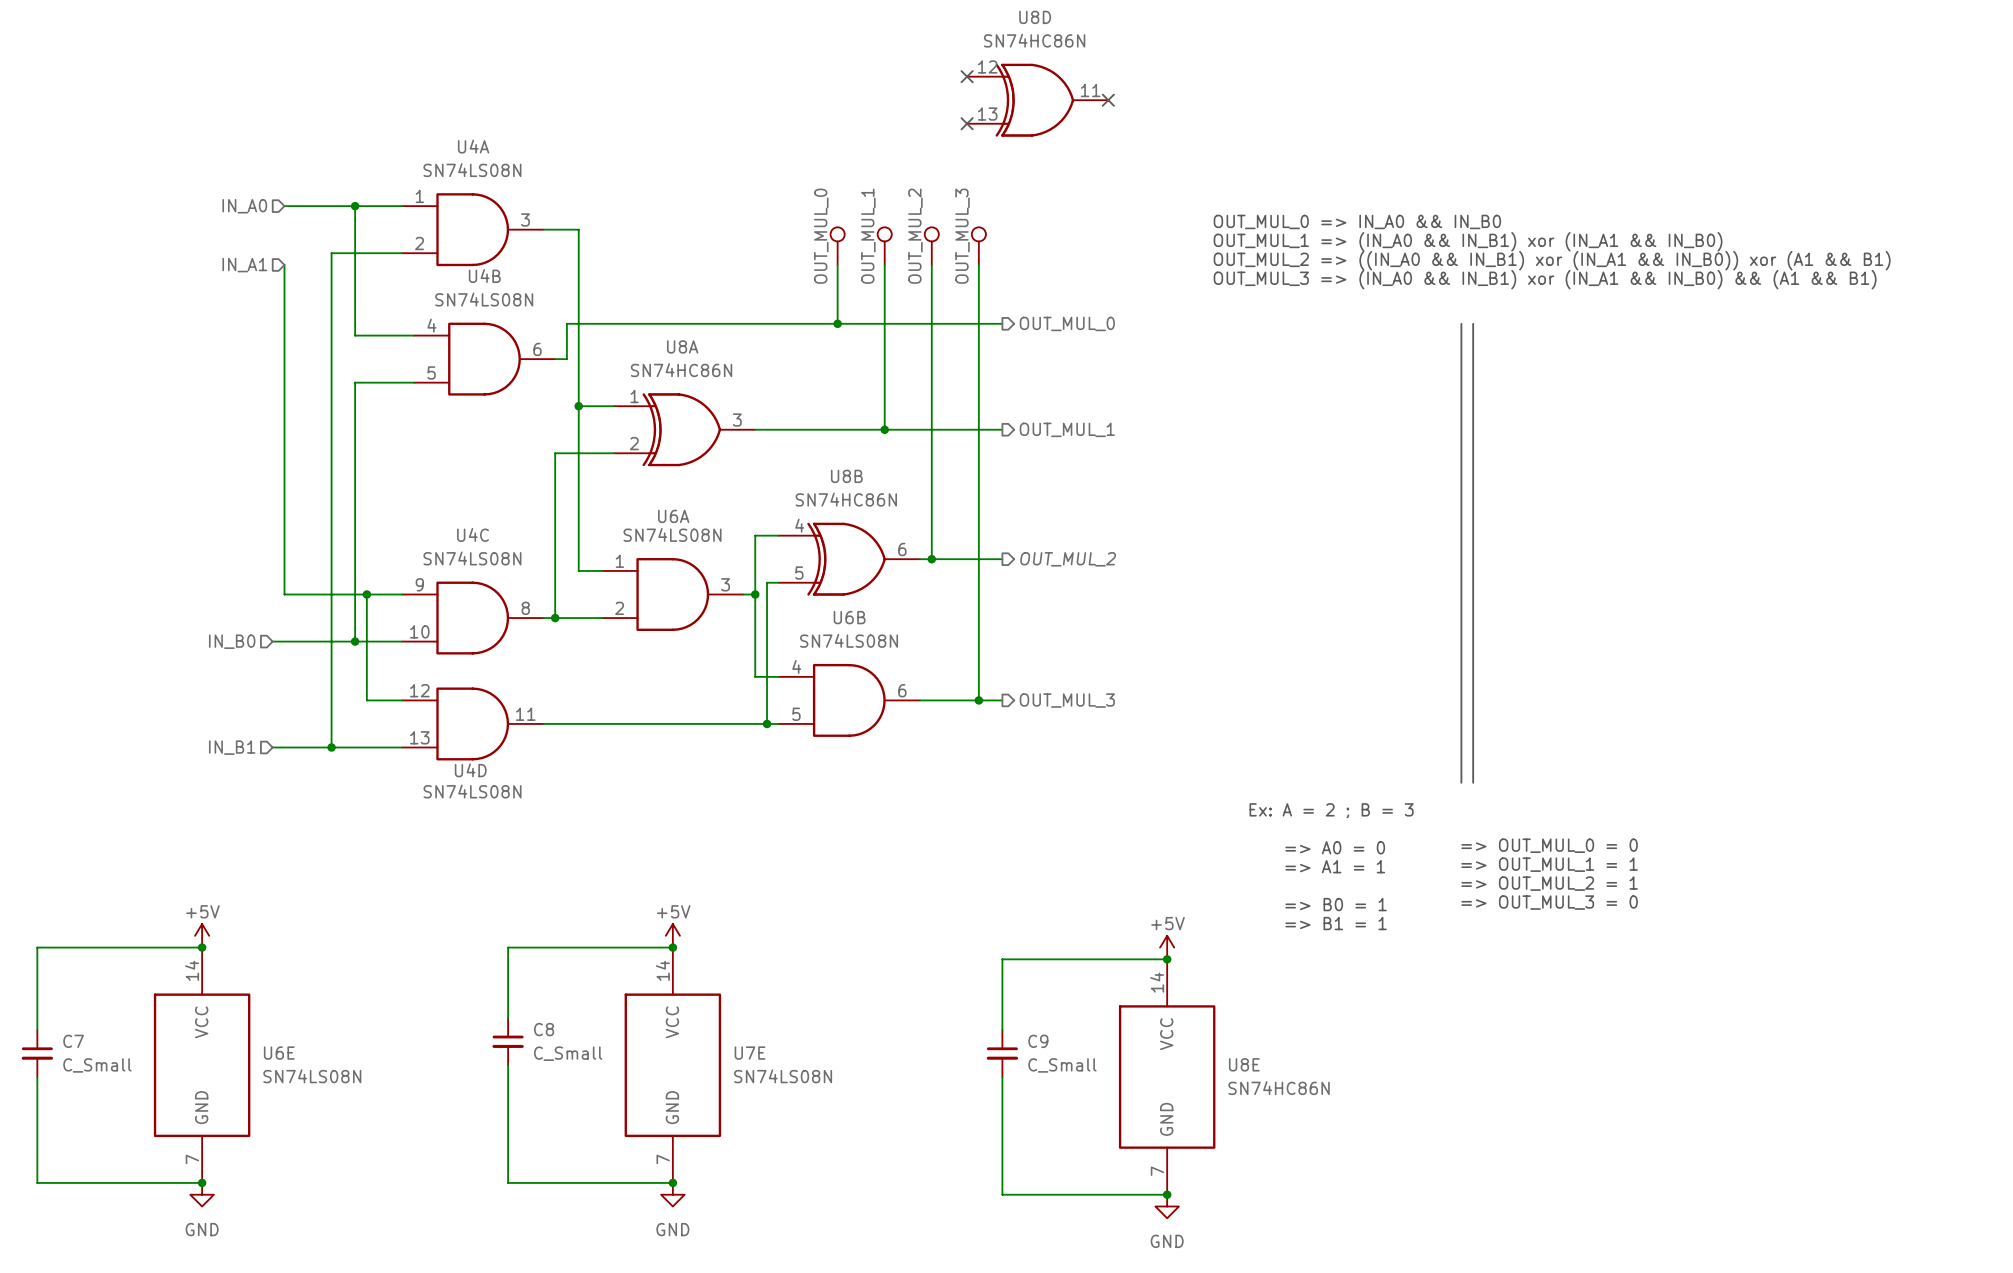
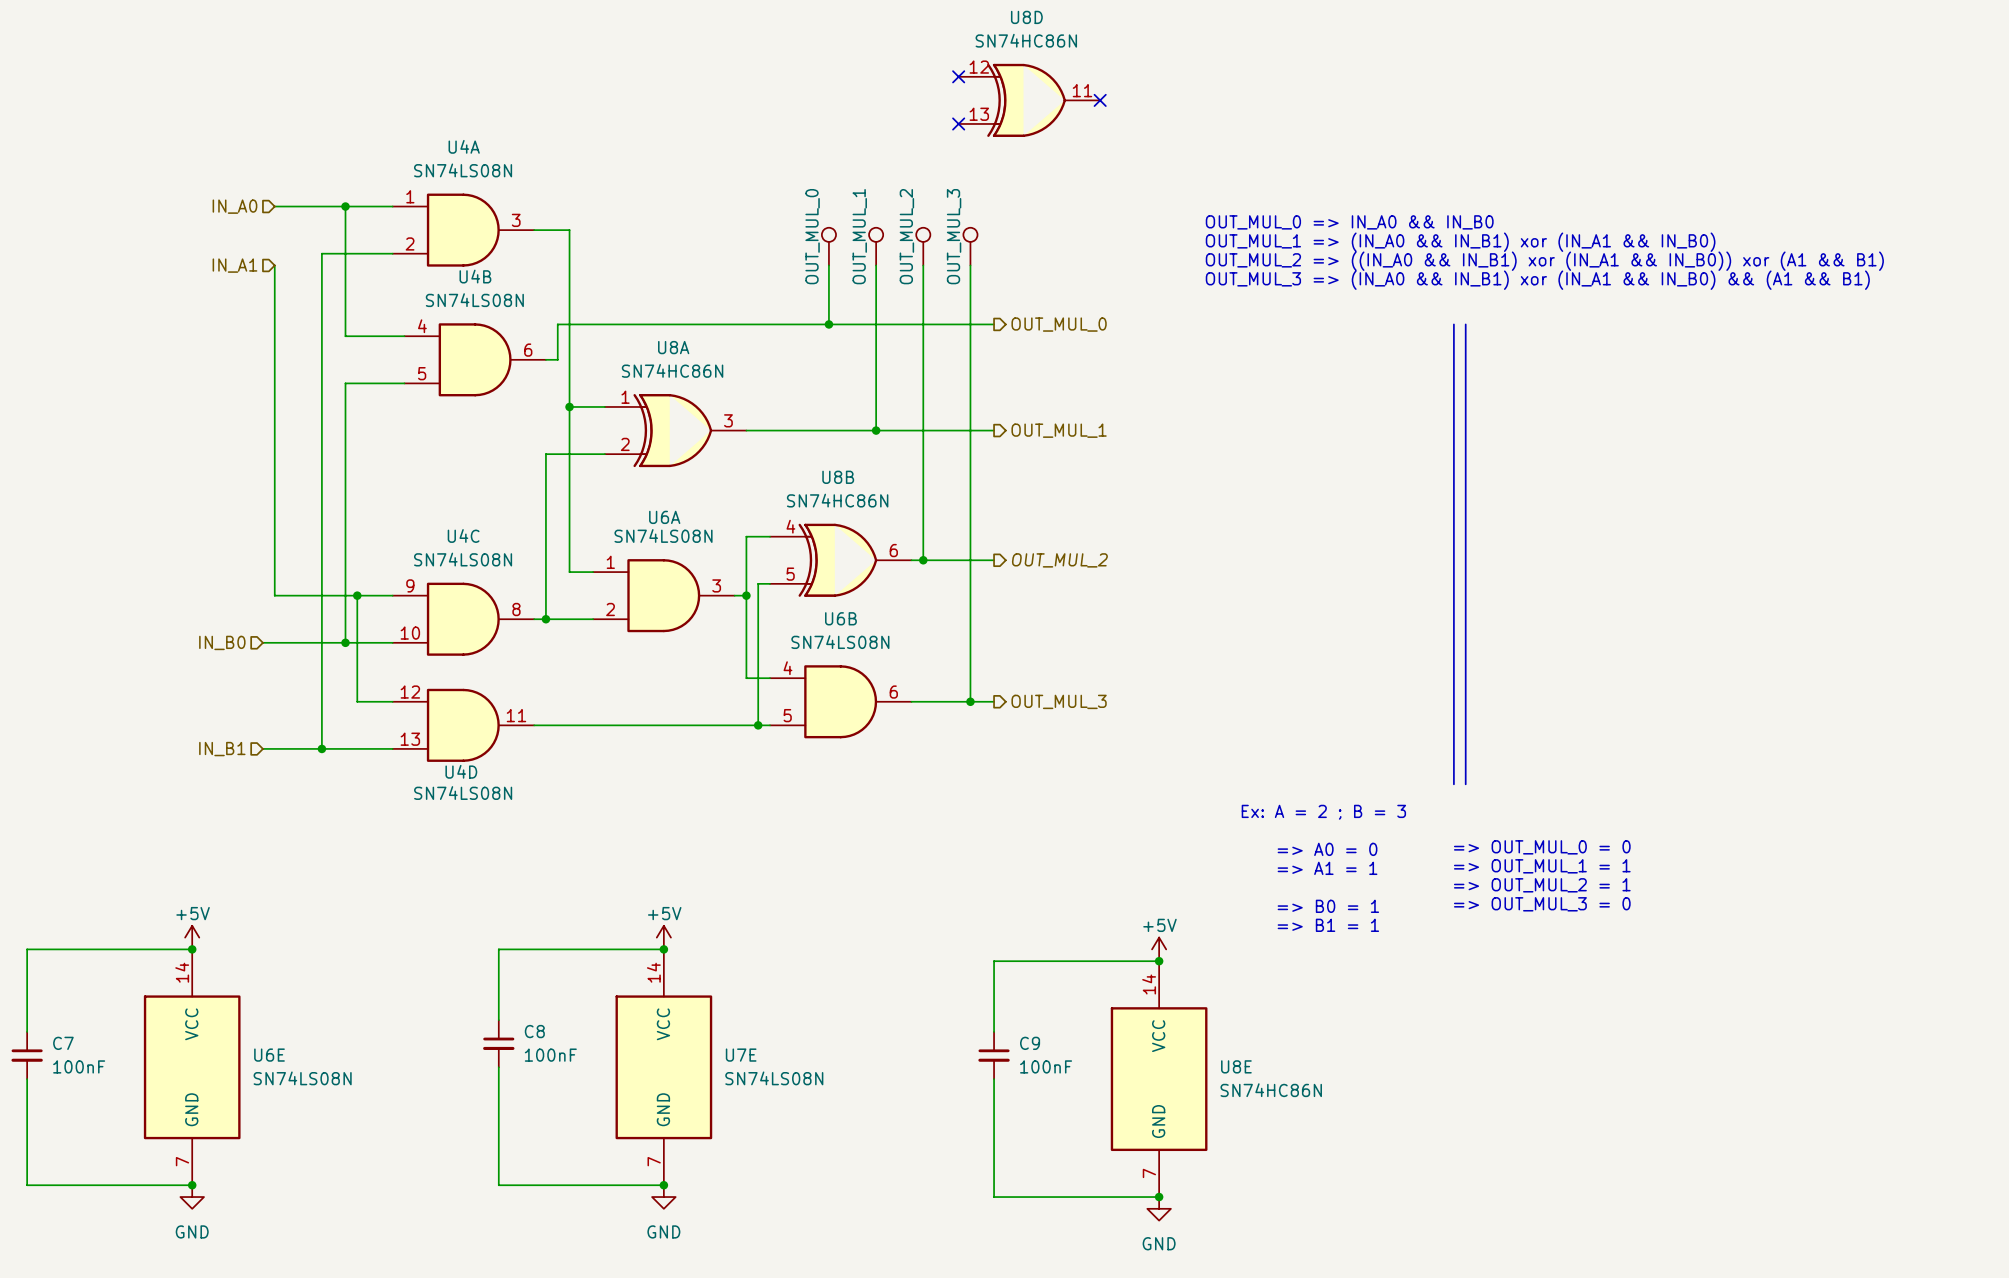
C8 value: C_Small (568, 1053) -> 100nF (550, 1055)
C7 value: C_Small (97, 1065) -> 100nF (79, 1066)
C9 value: C_Small (1062, 1065) -> 100nF (1046, 1066)

